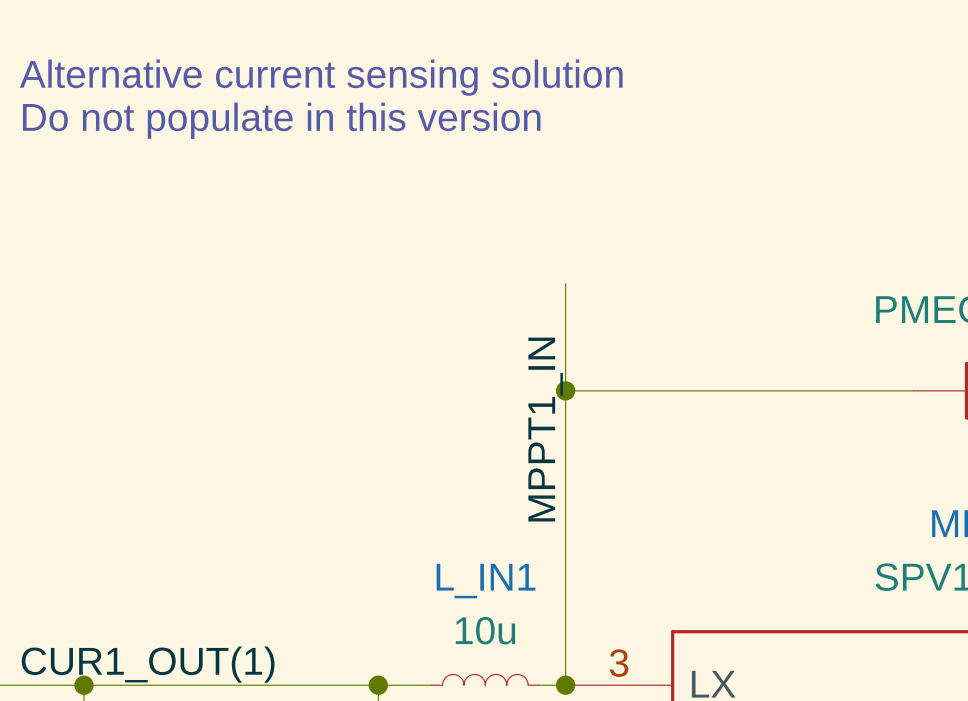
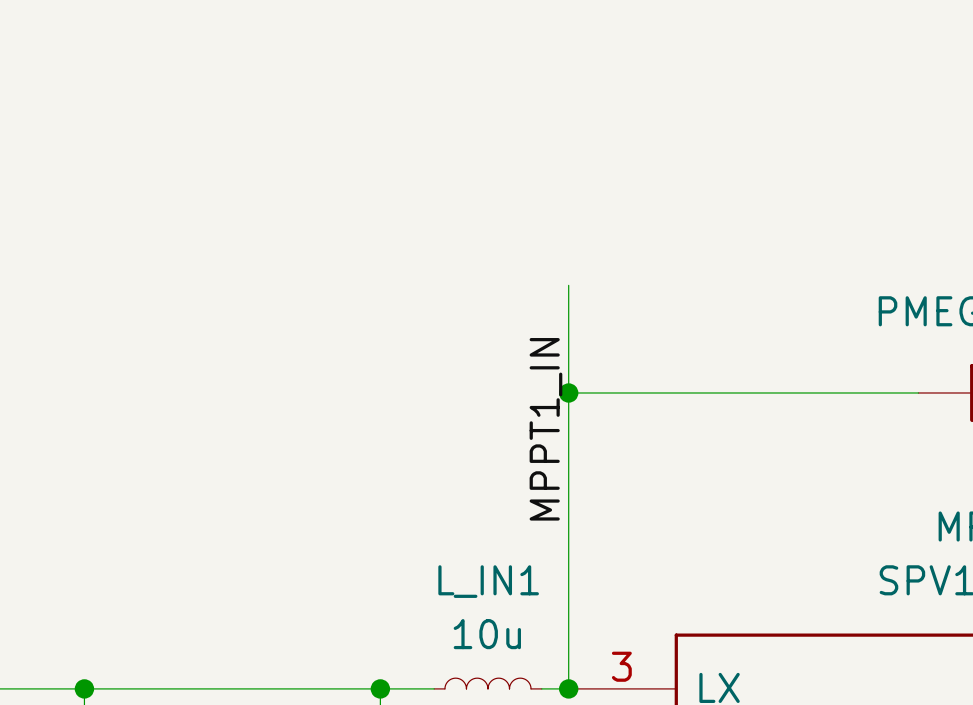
text: Alternative current sensing solution (321, 77) -> none
text: Do not populate in this version (281, 120) -> none
label: CUR1_OUT(1) (148, 664) -> none

